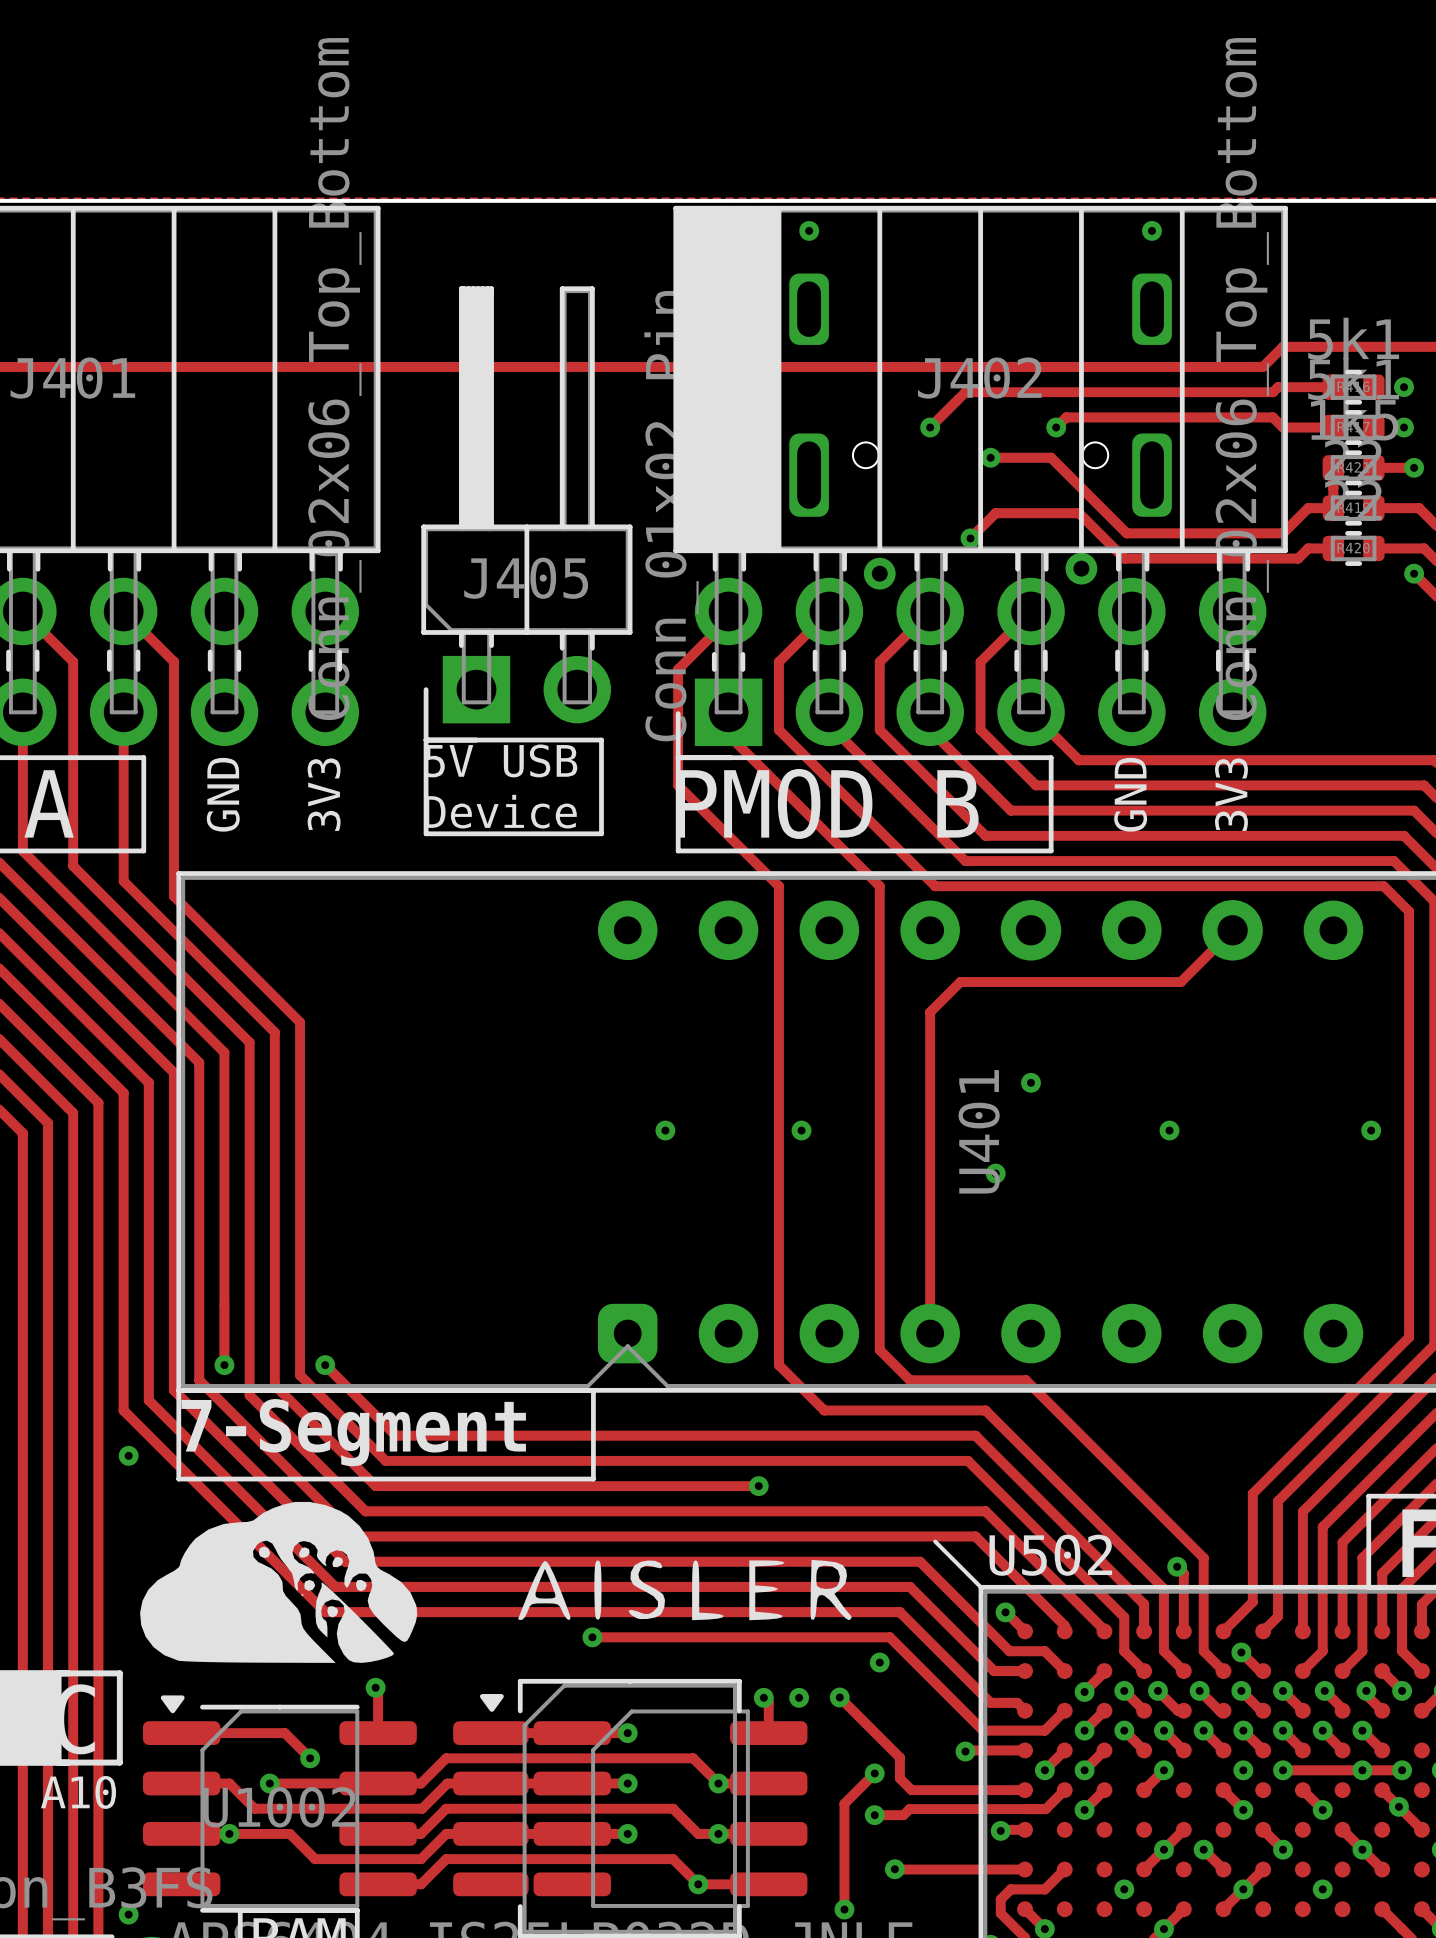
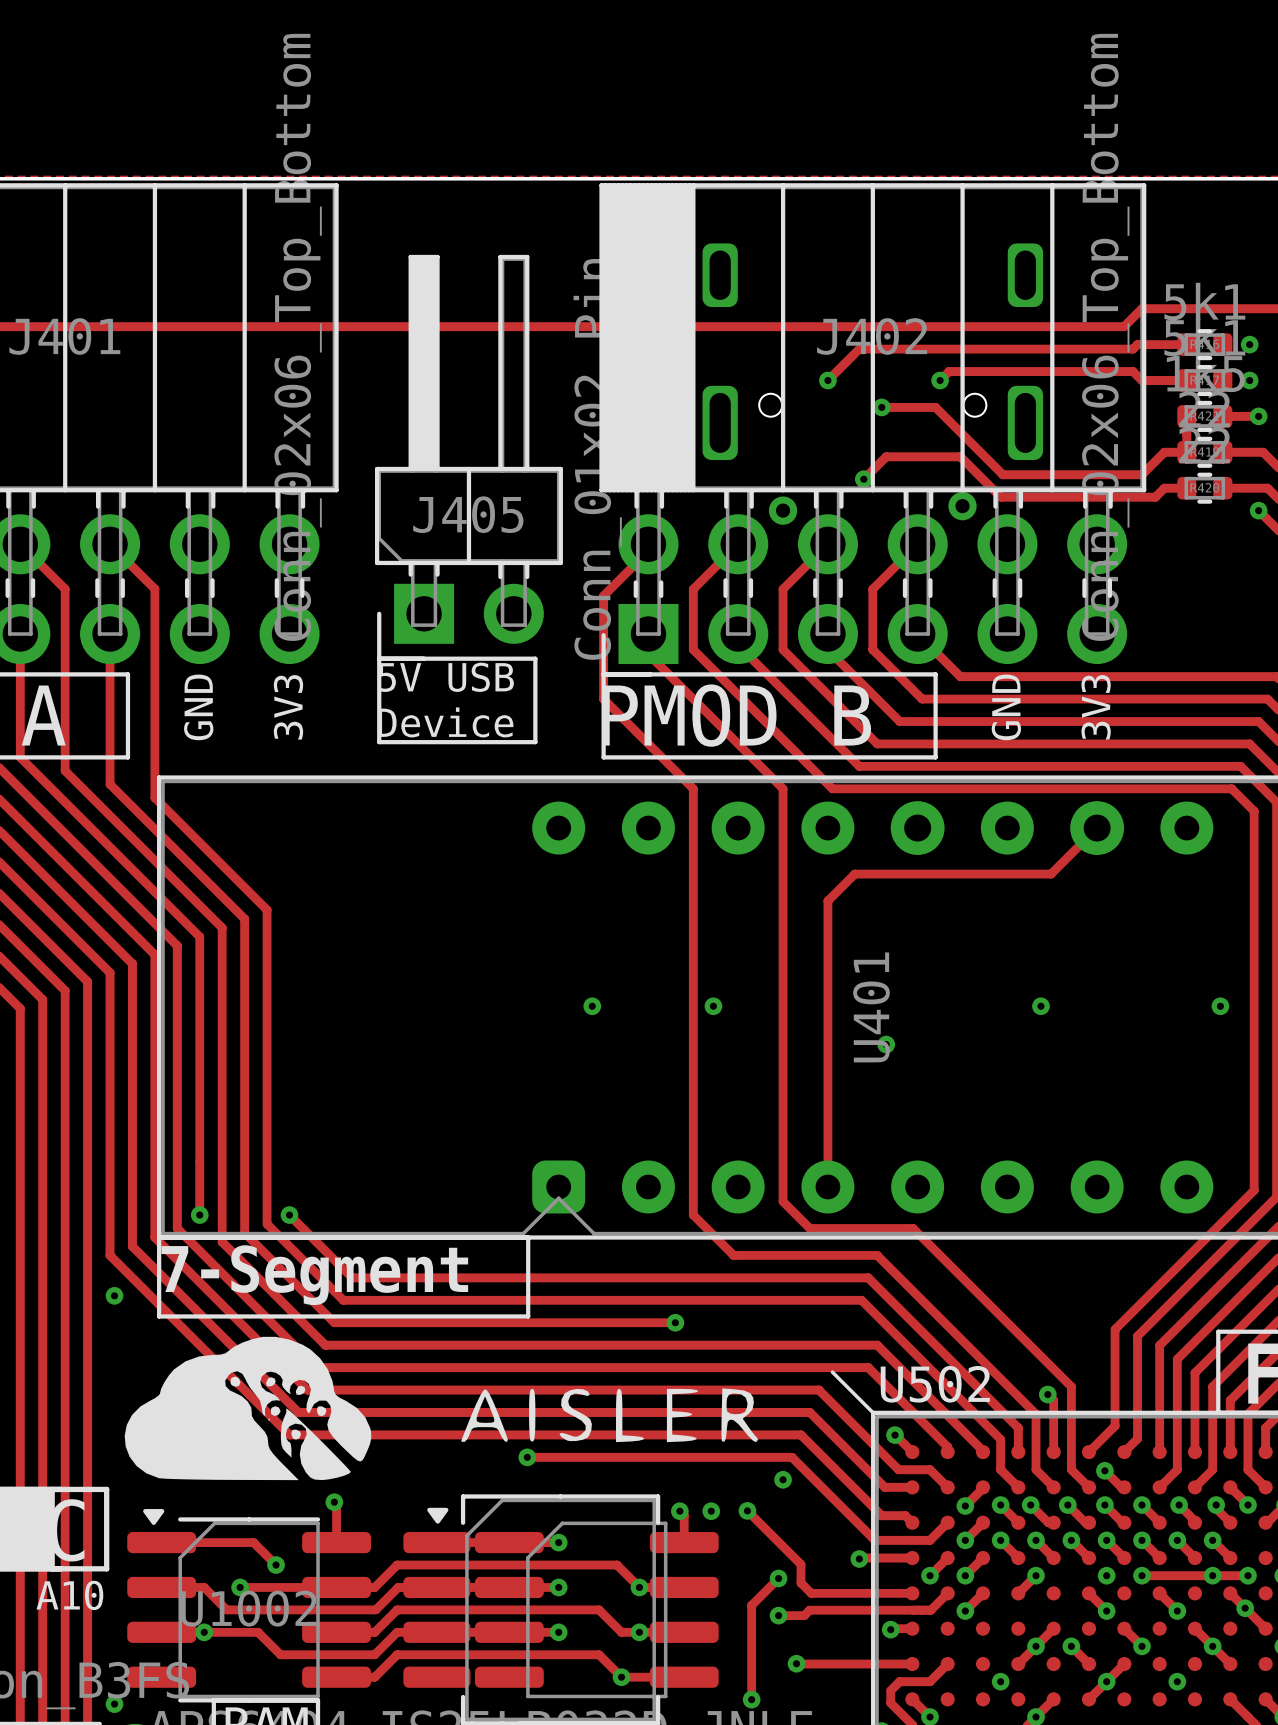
via: (809, 230) -> none
via: (1151, 230) -> none
via: (1030, 1082) -> none

